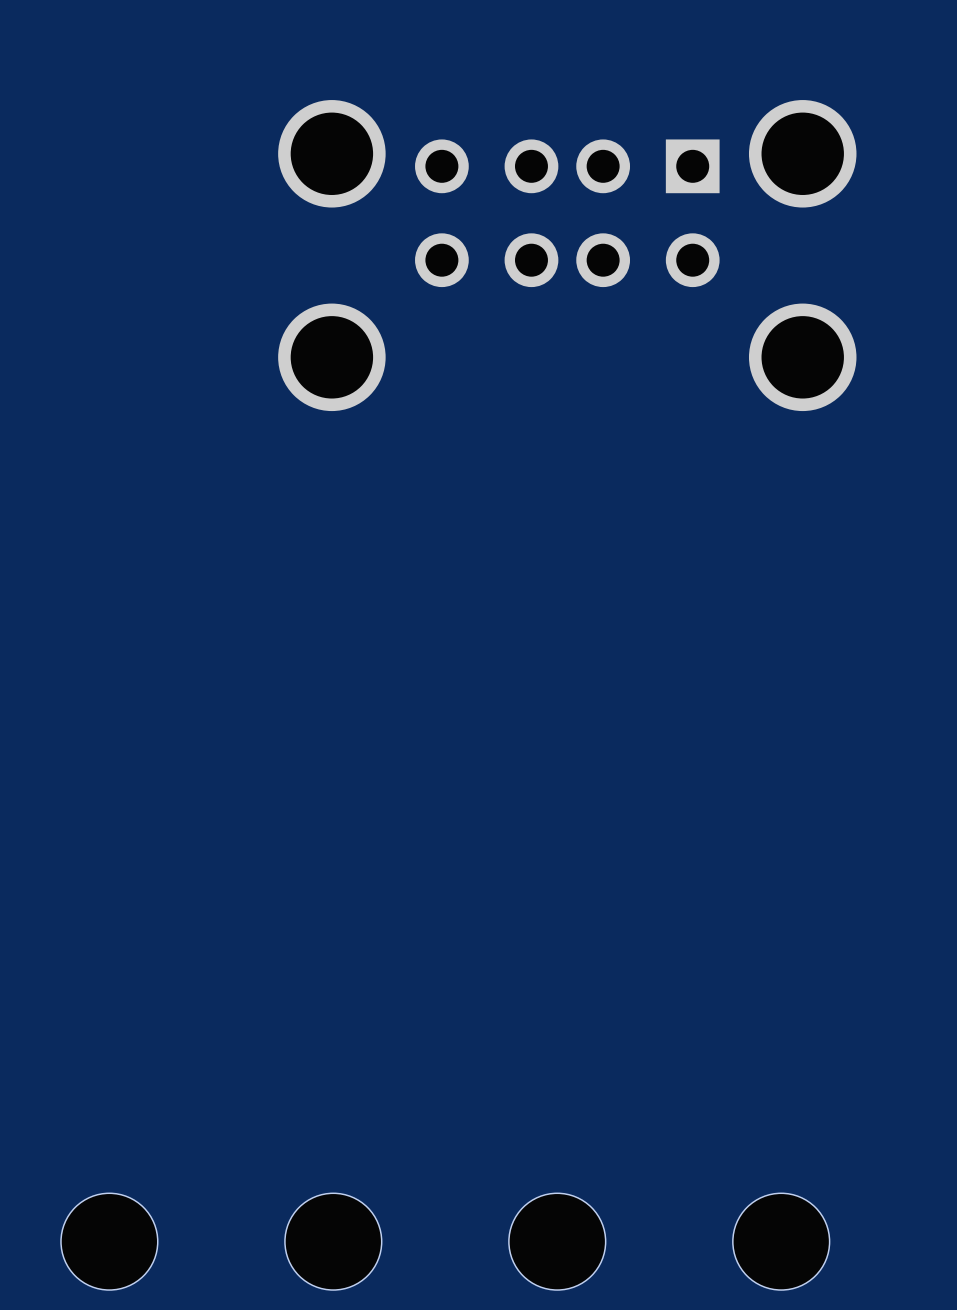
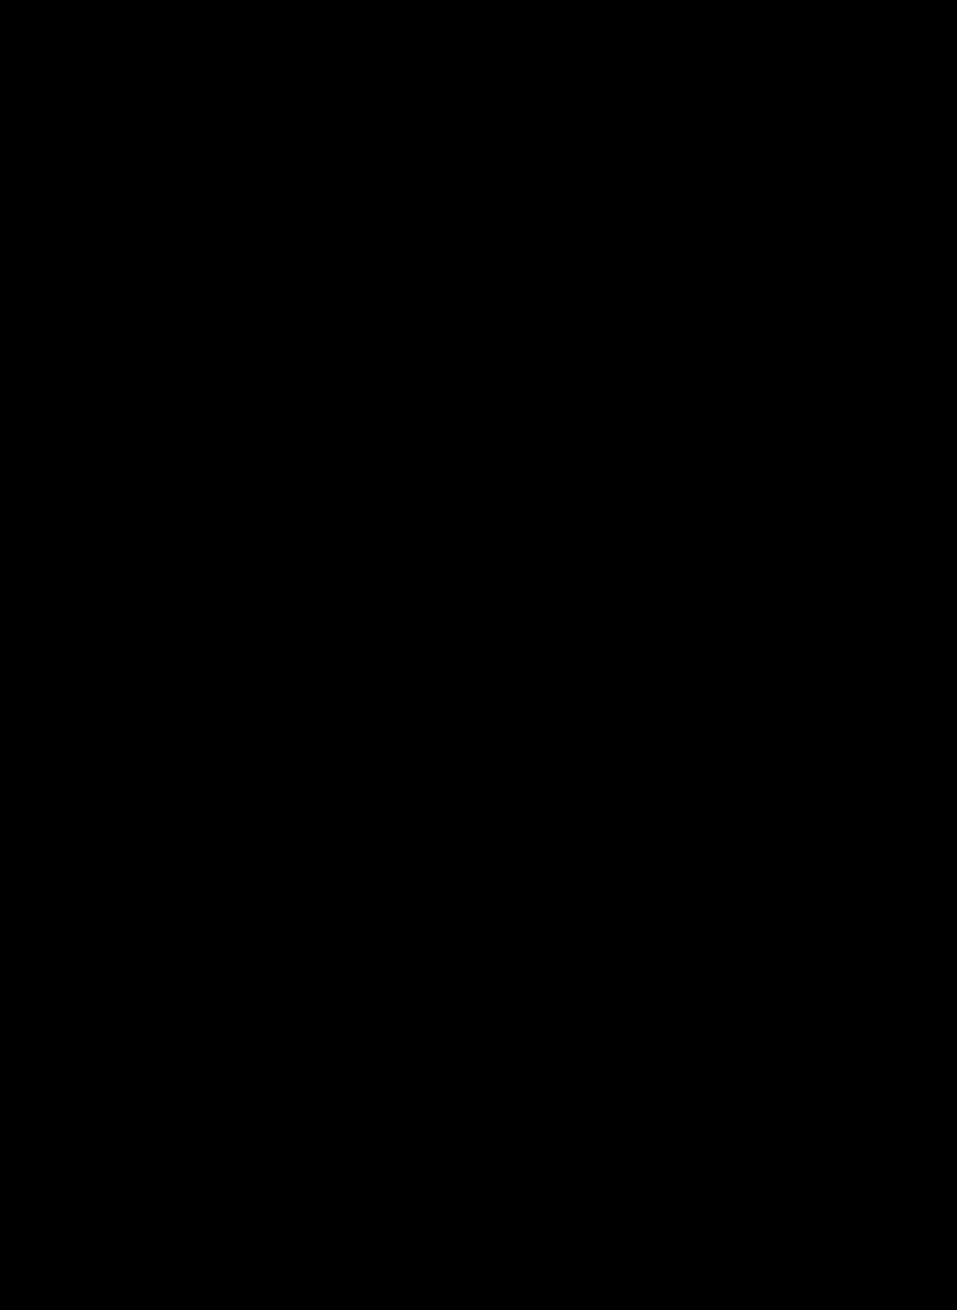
part: (567, 255) -> none
part: (109, 1241) -> none
part: (333, 1241) -> none
part: (557, 1241) -> none
part: (781, 1241) -> none

